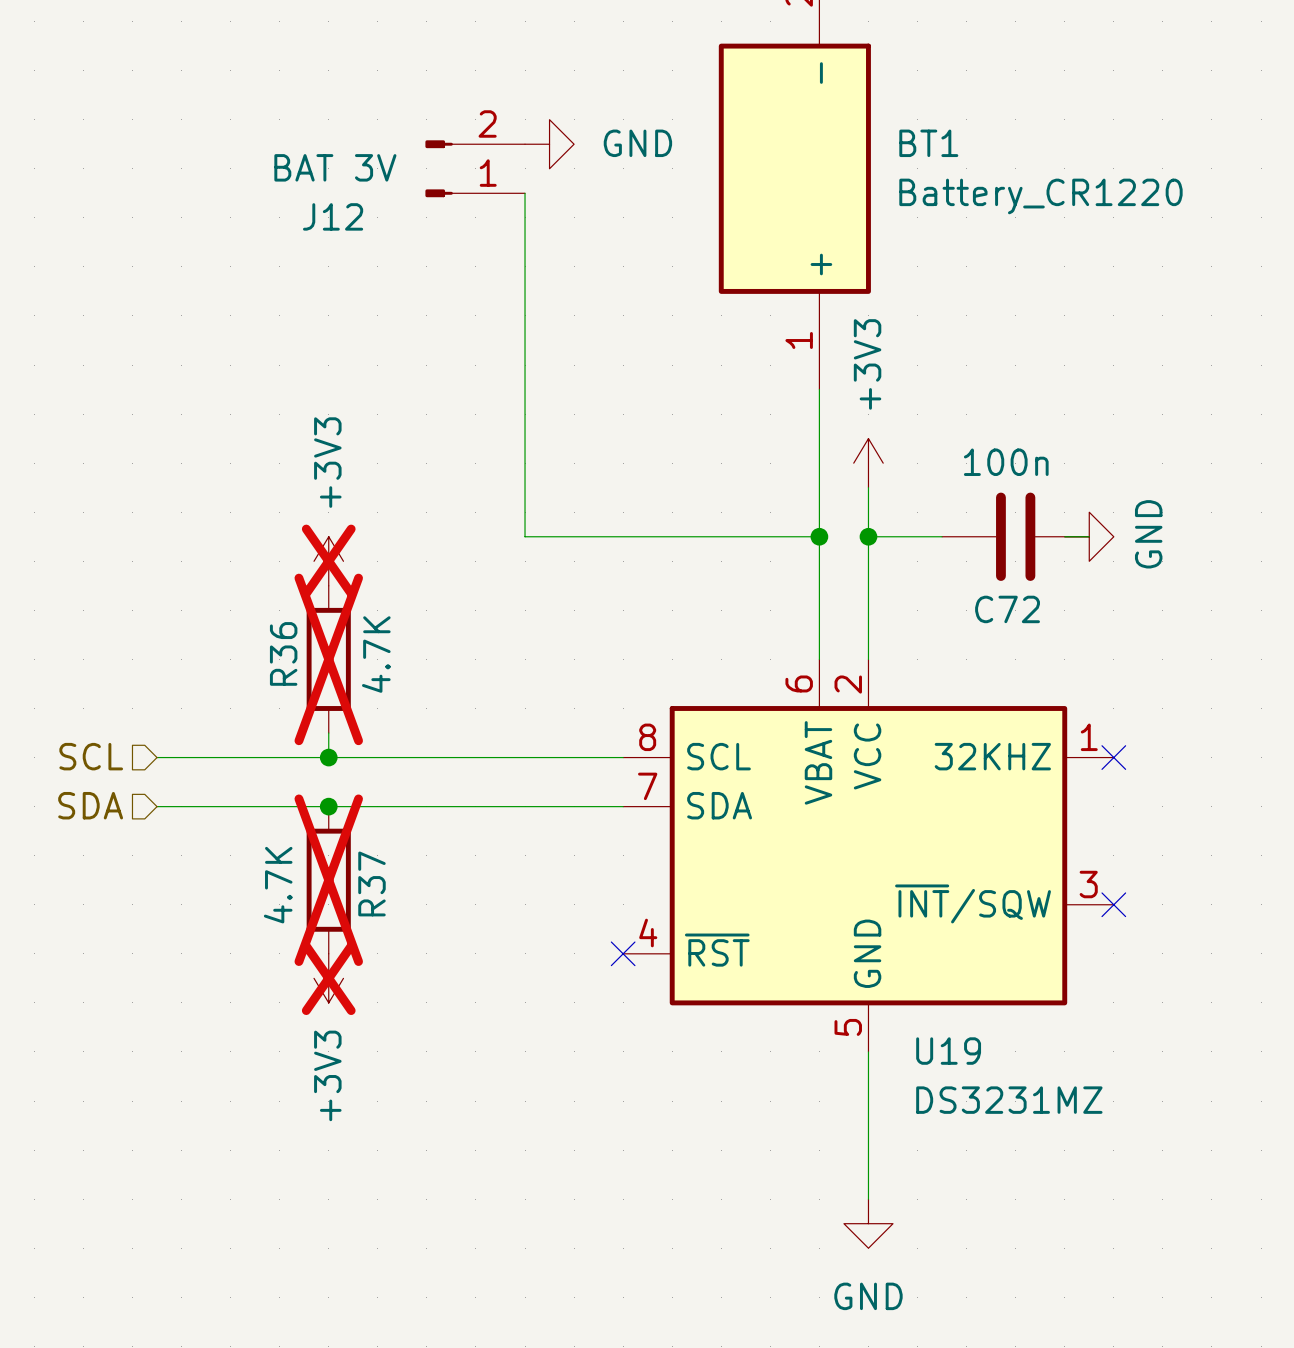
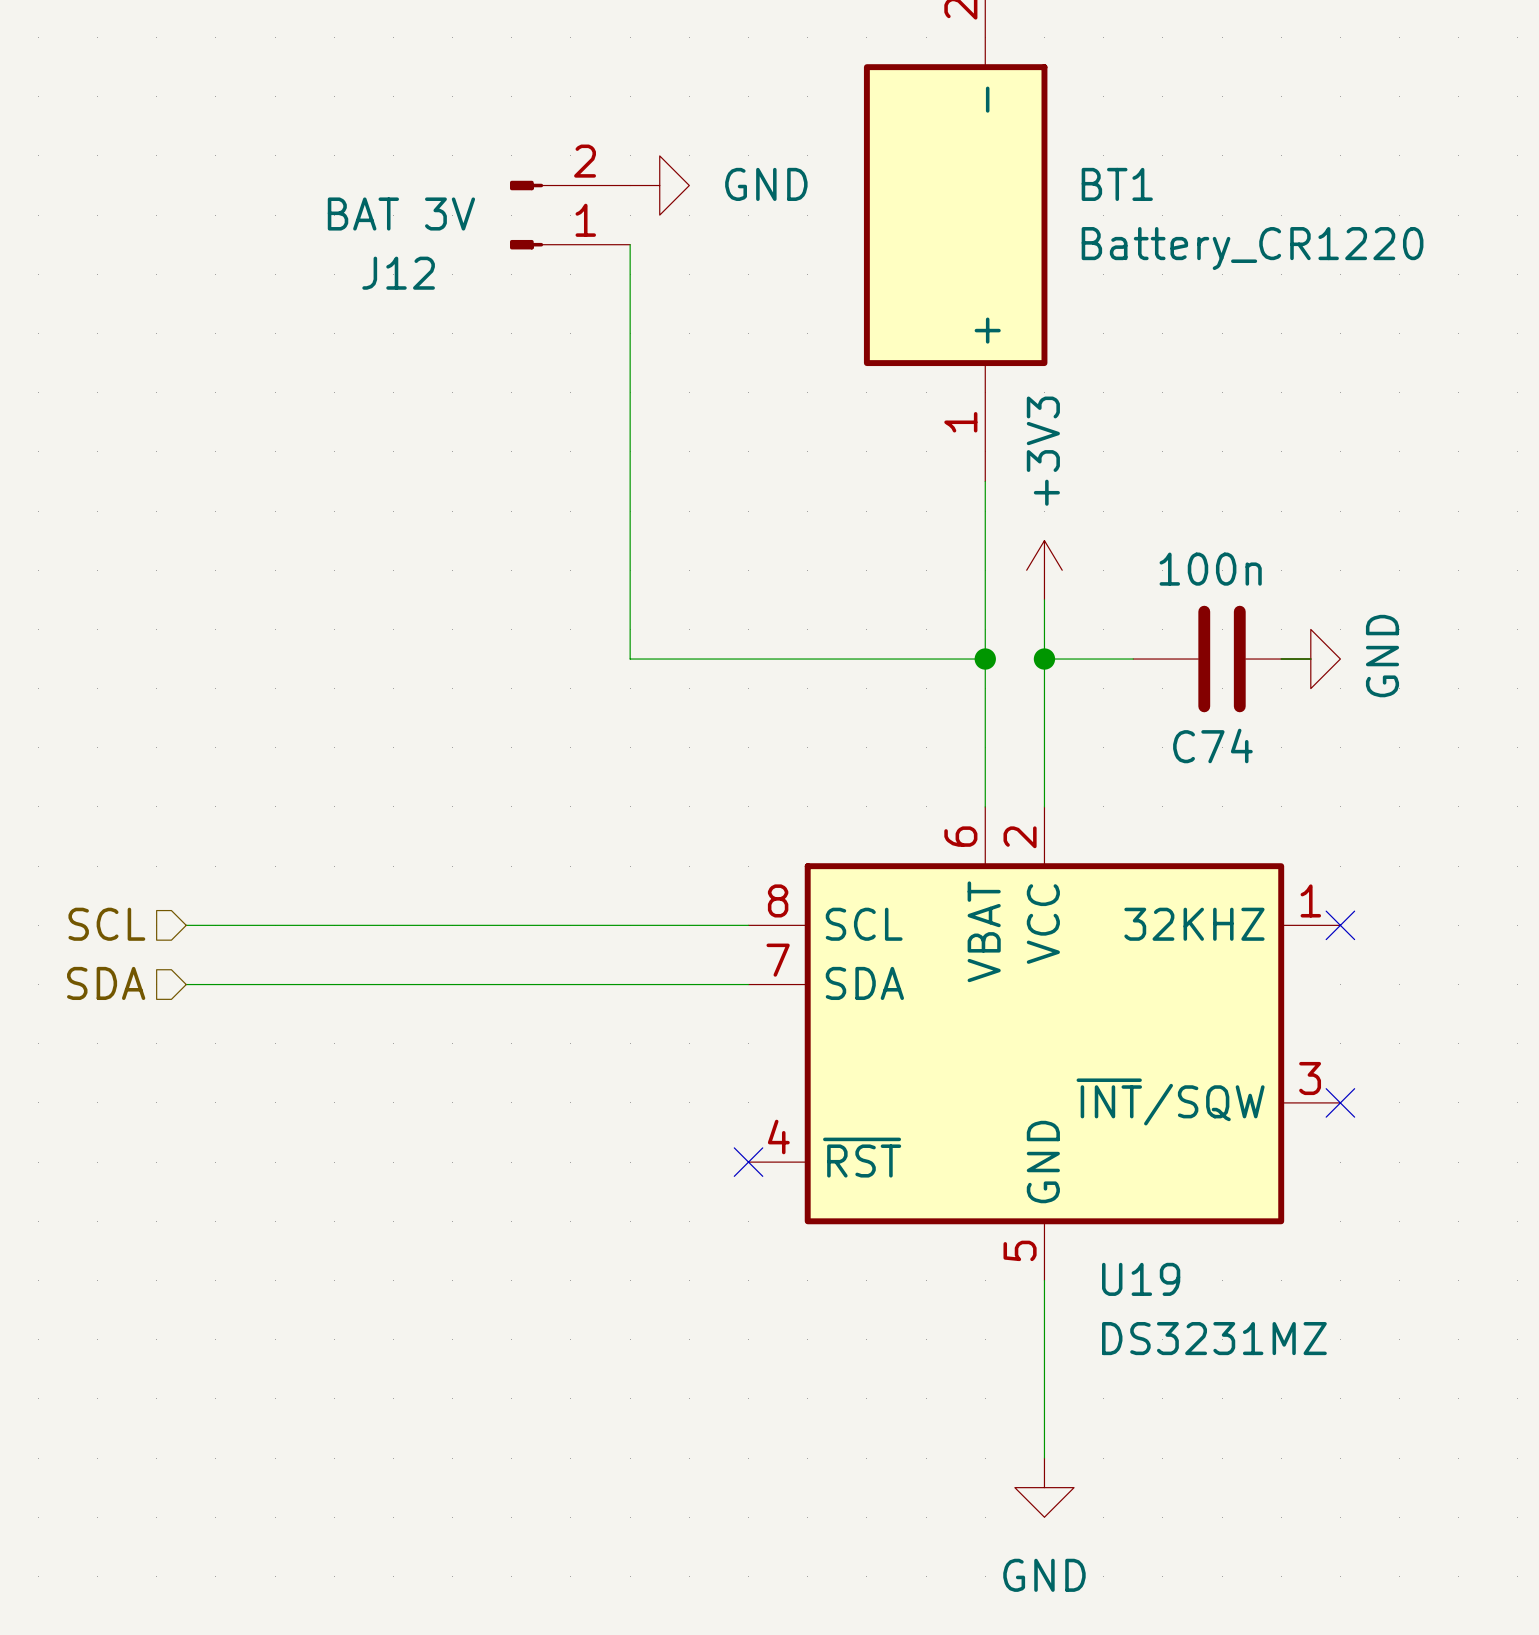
power symbol: +3V3 (328, 561) -> none
C72 name: C72 (1007, 609) -> C74 (1212, 745)
R36: 4.7K (328, 659) -> none
wire: (328, 733) (328, 757) -> none
junction: (328, 757) -> none
junction: (328, 806) -> none
R37: 4.7K (328, 880) -> none
power symbol: +3V3 (328, 978) -> none

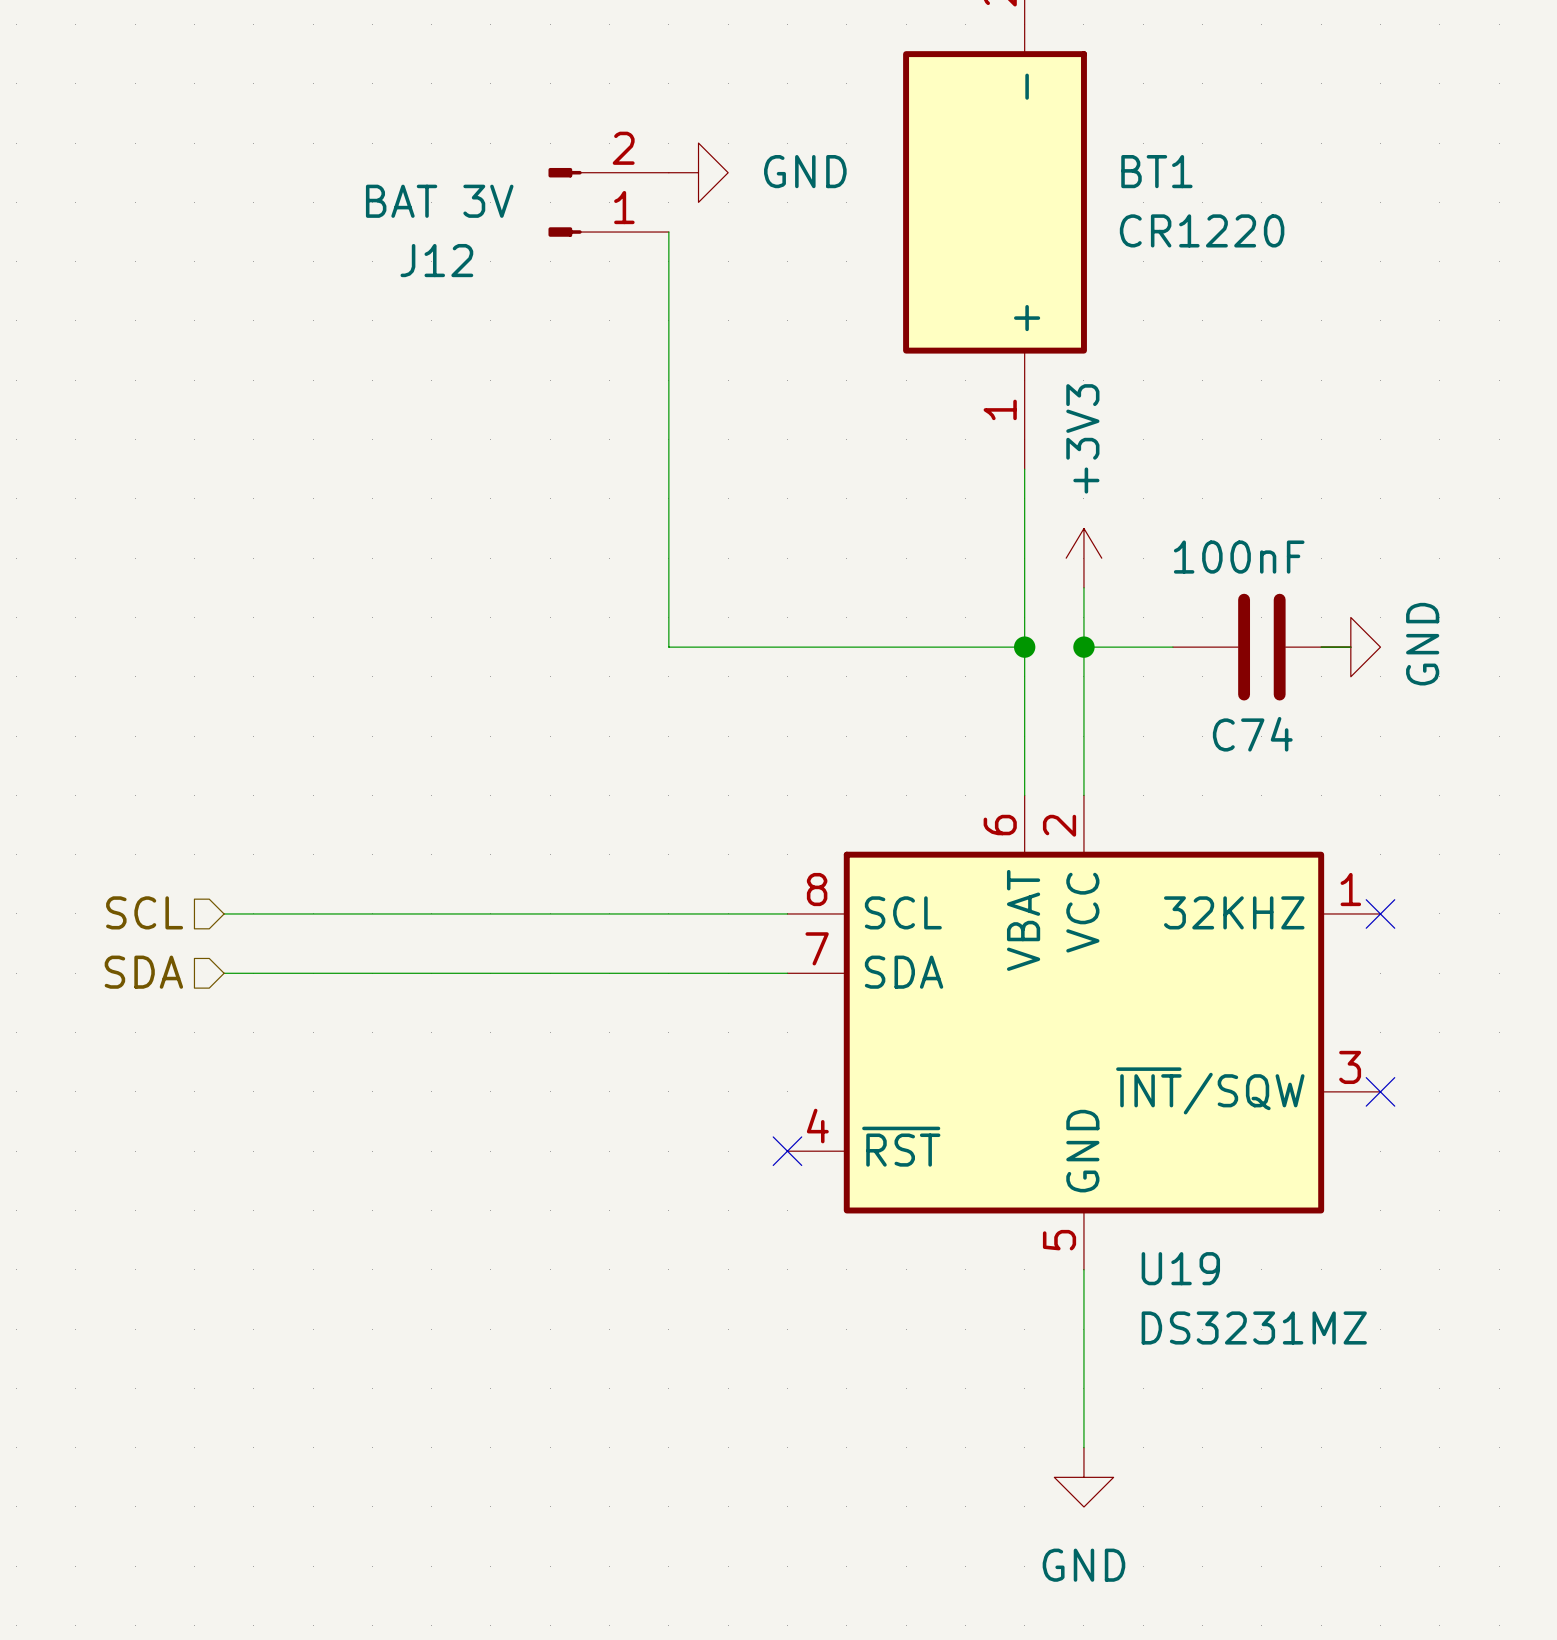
BT1 value: Battery_CR1220 (1252, 248) -> CR1220 (1202, 230)
C74 value: 100n (1210, 569) -> 100nF (1239, 557)

